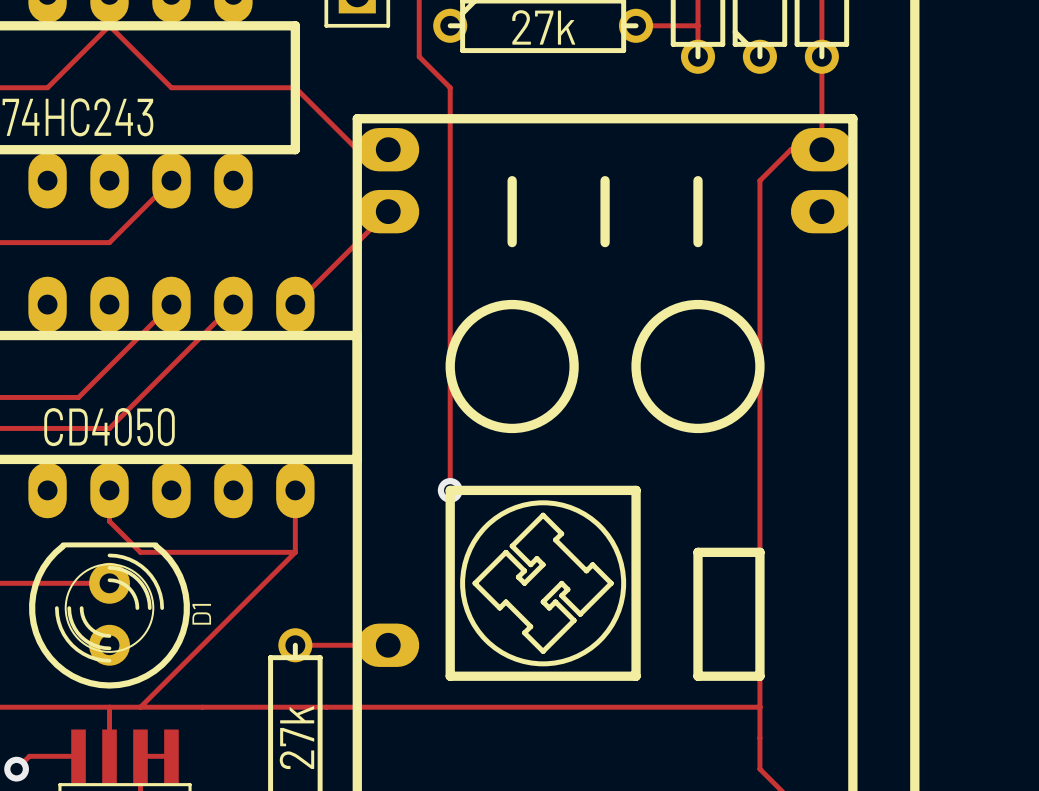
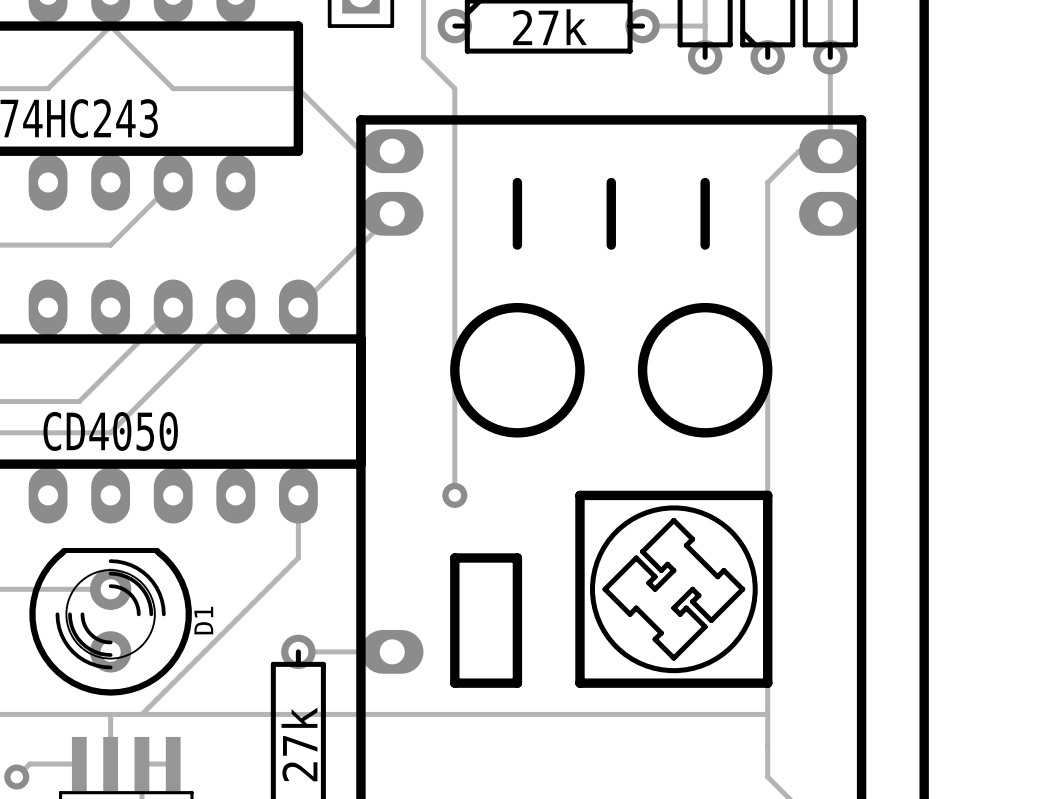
track: (109, 490) (109, 521) (140, 552) (295, 552) -> none
line: (574, 490) (450, 490) (450, 552) -> (579, 495) (579, 683)
line: (636, 490) (636, 676) -> (642, 495) (767, 495) (767, 557)
line: (759, 552) (698, 552) (698, 676) -> (642, 683) (705, 683)
drawing position: (543, 583) -> (673, 589)
line: (512, 676) (574, 676) -> (517, 683) (517, 557) (454, 557)

